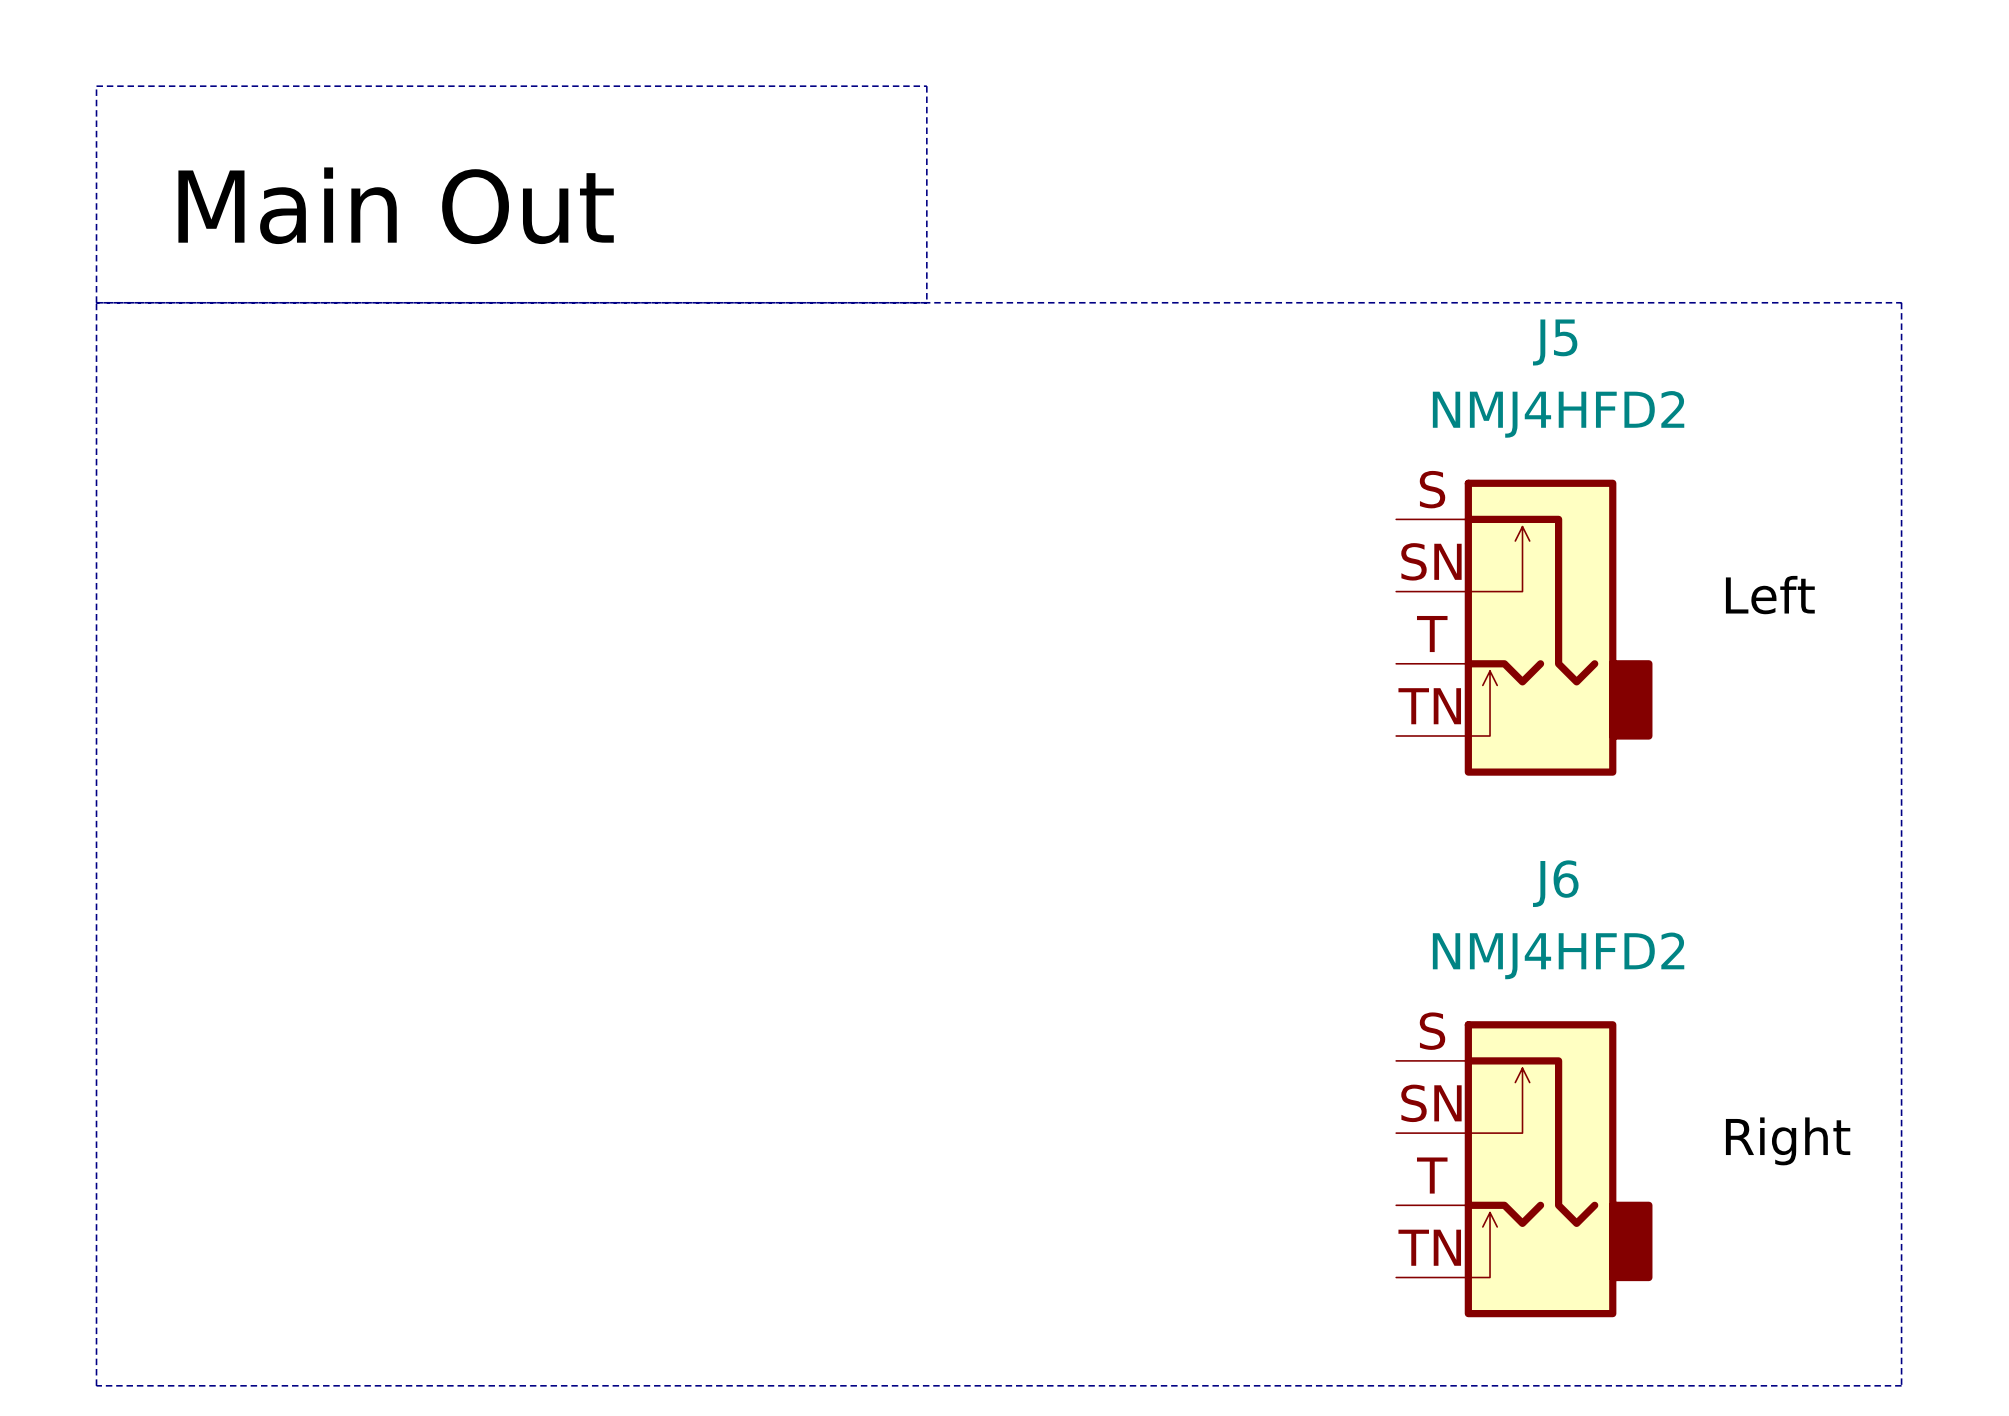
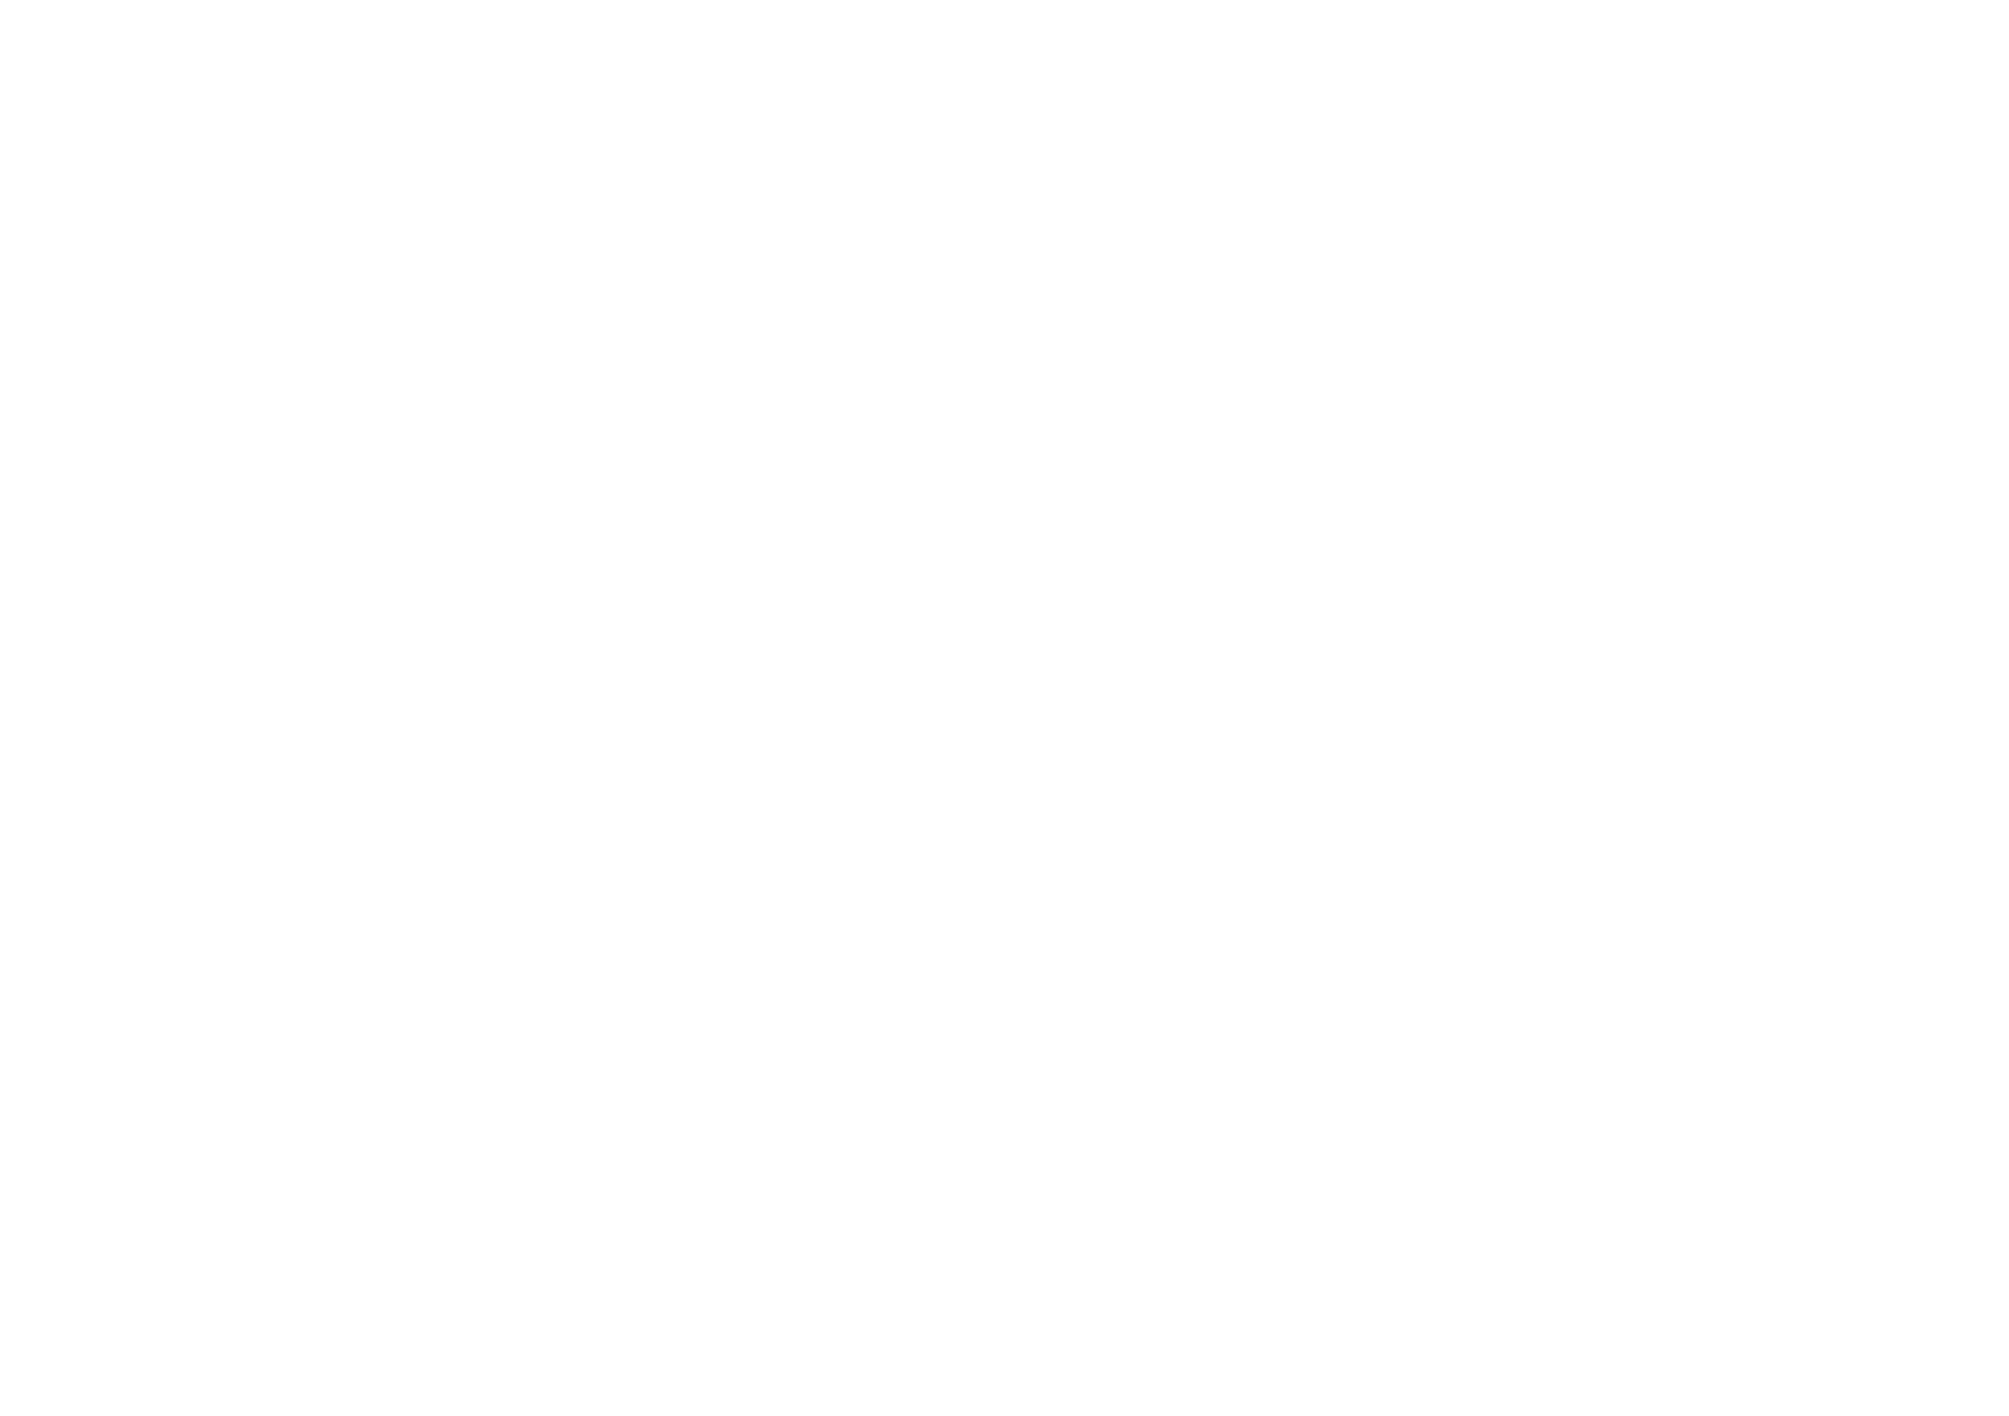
label: Main Out (396, 205) -> none
line: (96, 302) (1901, 302) (1901, 1385) (96, 1385) (96, 86) (926, 86) (926, 302) -> none
label: Left (1770, 595) -> none
J5: NMJ4HFD2 (1524, 627) -> none
label: Right (1788, 1141) -> none
J6: NMJ4HFD2 (1524, 1169) -> none

